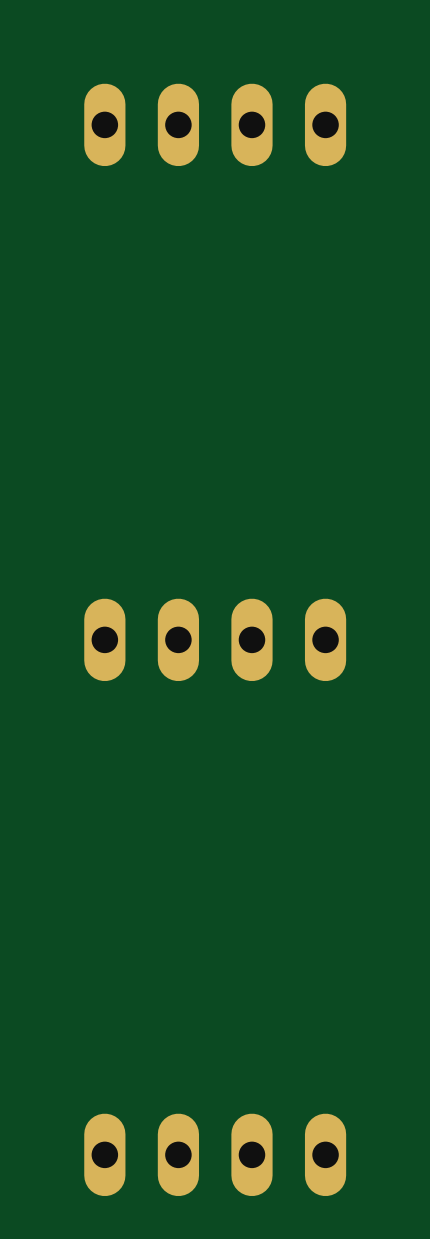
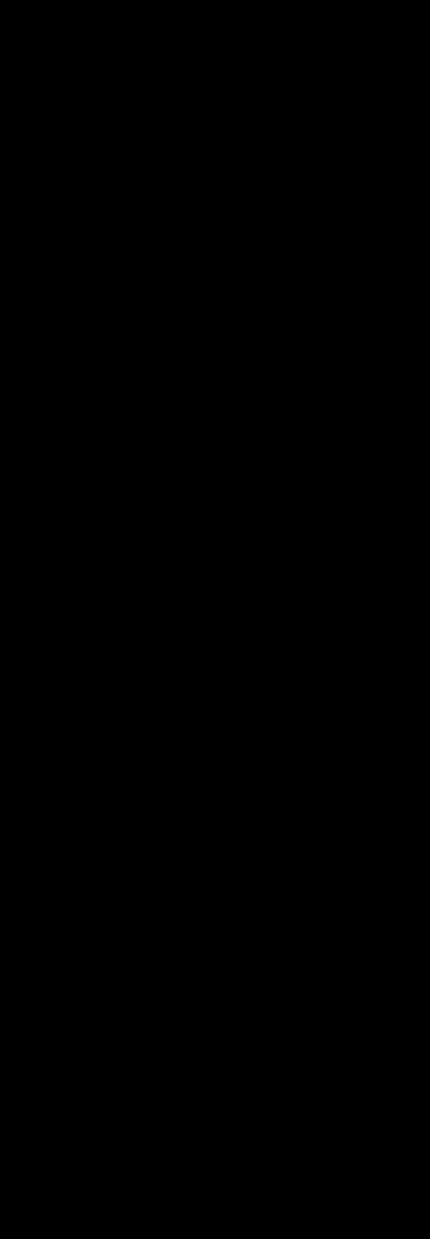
part: (215, 124) -> none
part: (215, 639) -> none
part: (215, 1154) -> none

